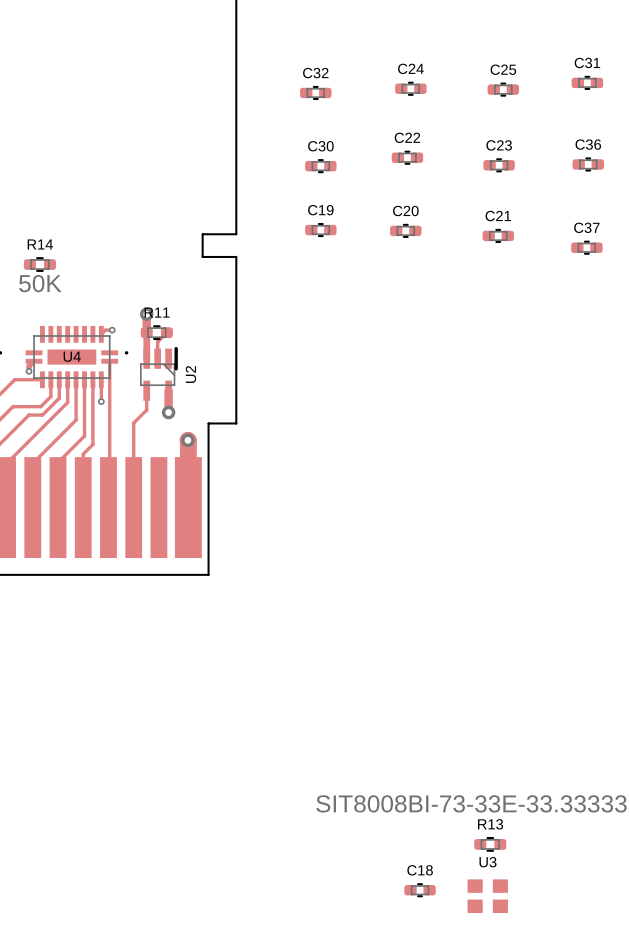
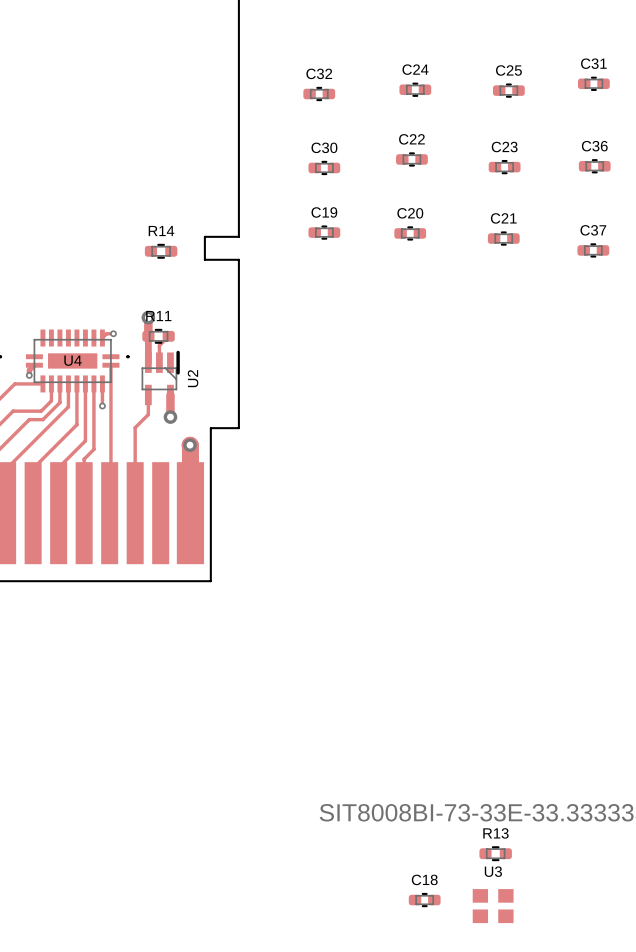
R14 position: (39, 264) -> (161, 251)
R14 value: 50K (40, 283) -> none

